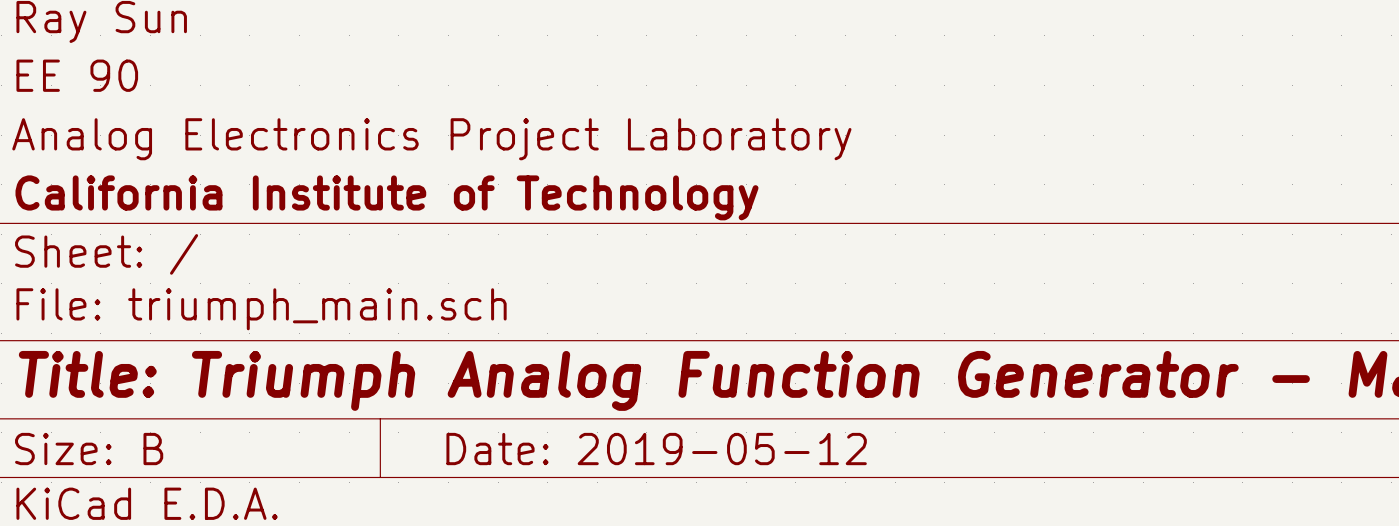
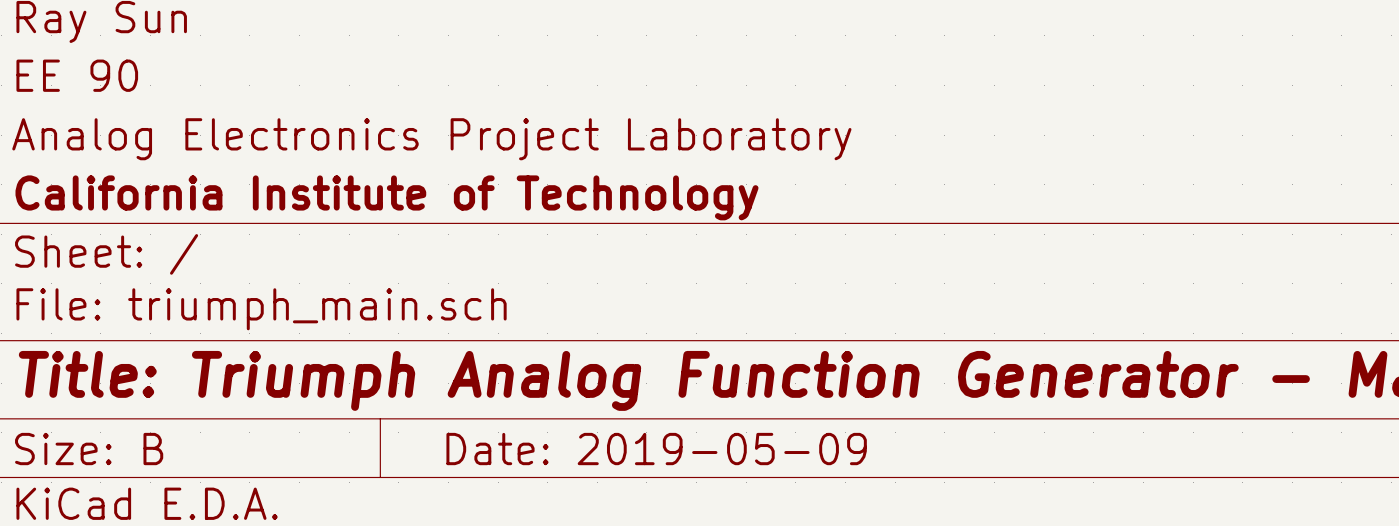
title block: Date: 2019-05-12 (656, 449) -> Date: 2019-05-09 (656, 449)

